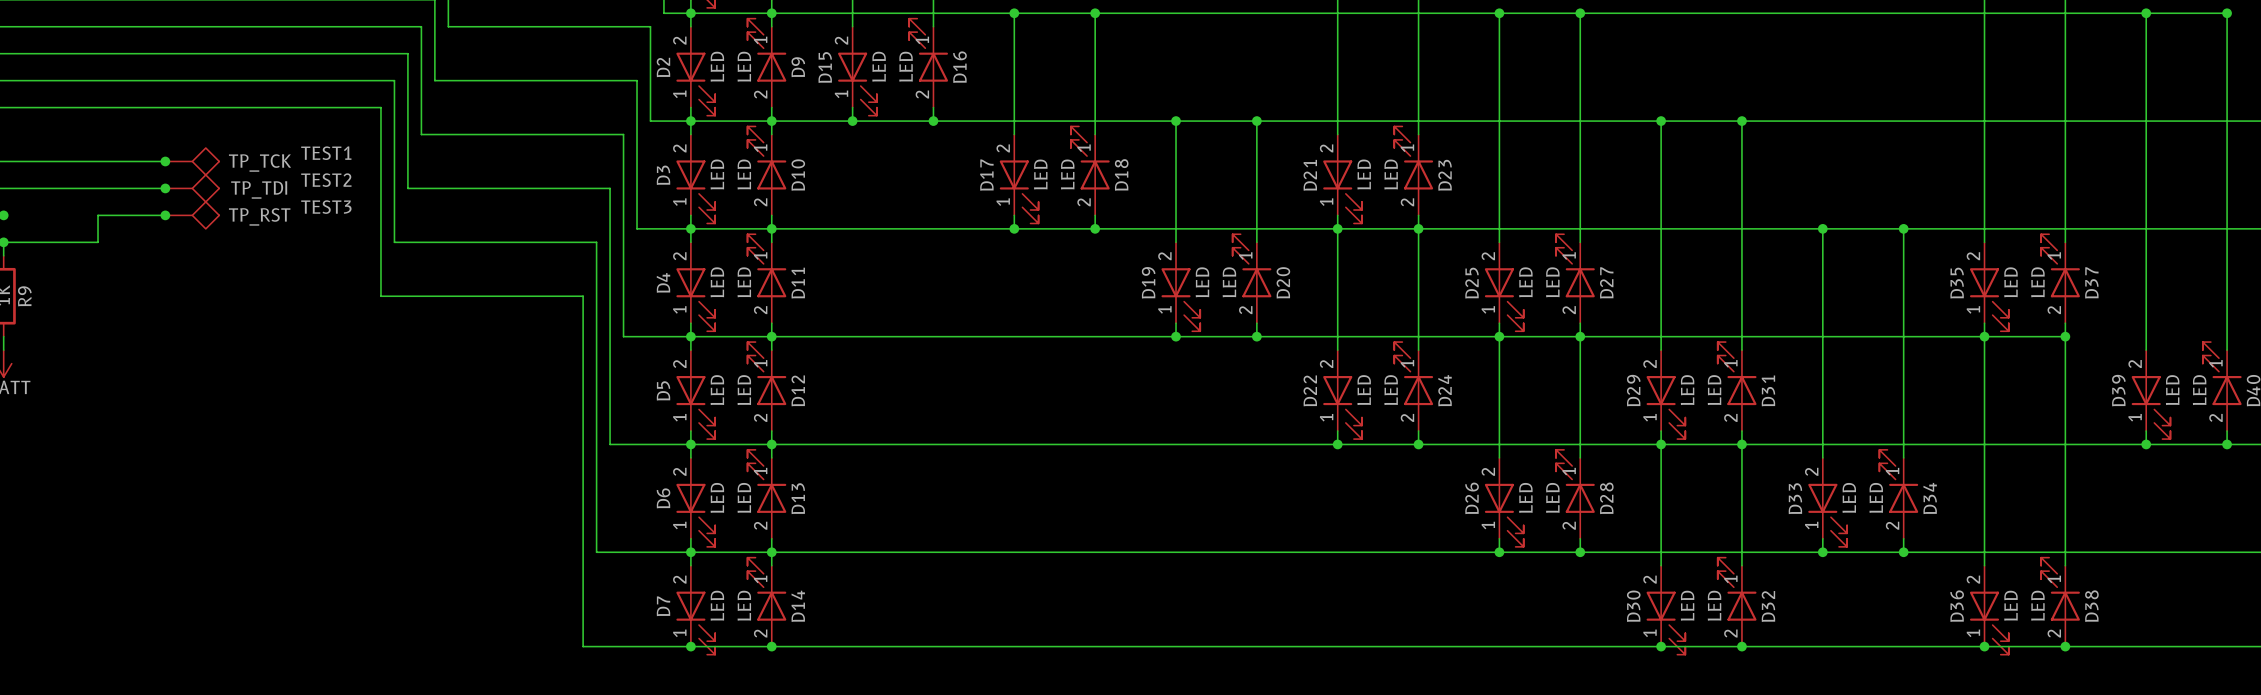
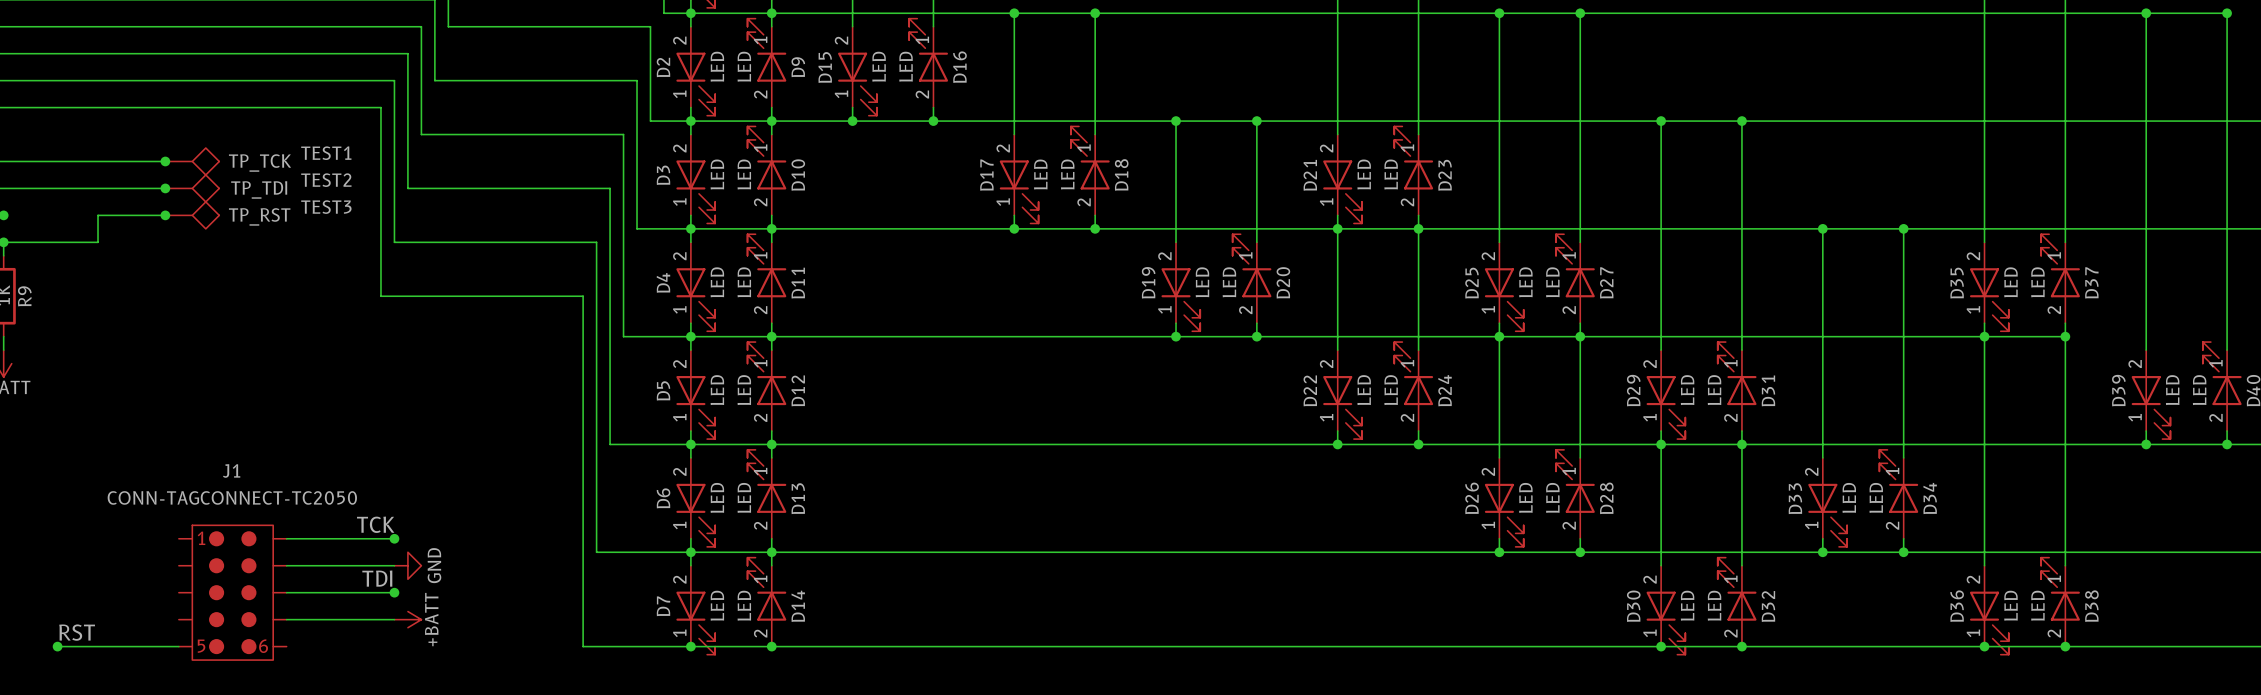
label: none -> TCK (375, 524)
wire: none -> (286, 538) (394, 538)
junction: none -> (394, 538)
wire: none -> (286, 565) (394, 565)
power symbol: none -> GND (407, 565)
label: none -> TDI (377, 578)
J1: none -> CONN-TAGCONNECT-TC2050 (232, 592)
wire: none -> (286, 592) (394, 592)
junction: none -> (394, 592)
wire: none -> (286, 619) (394, 619)
power symbol: none -> +BATT (407, 619)
label: none -> RST (77, 632)
wire: none -> (57, 646) (178, 646)
junction: none -> (57, 646)

